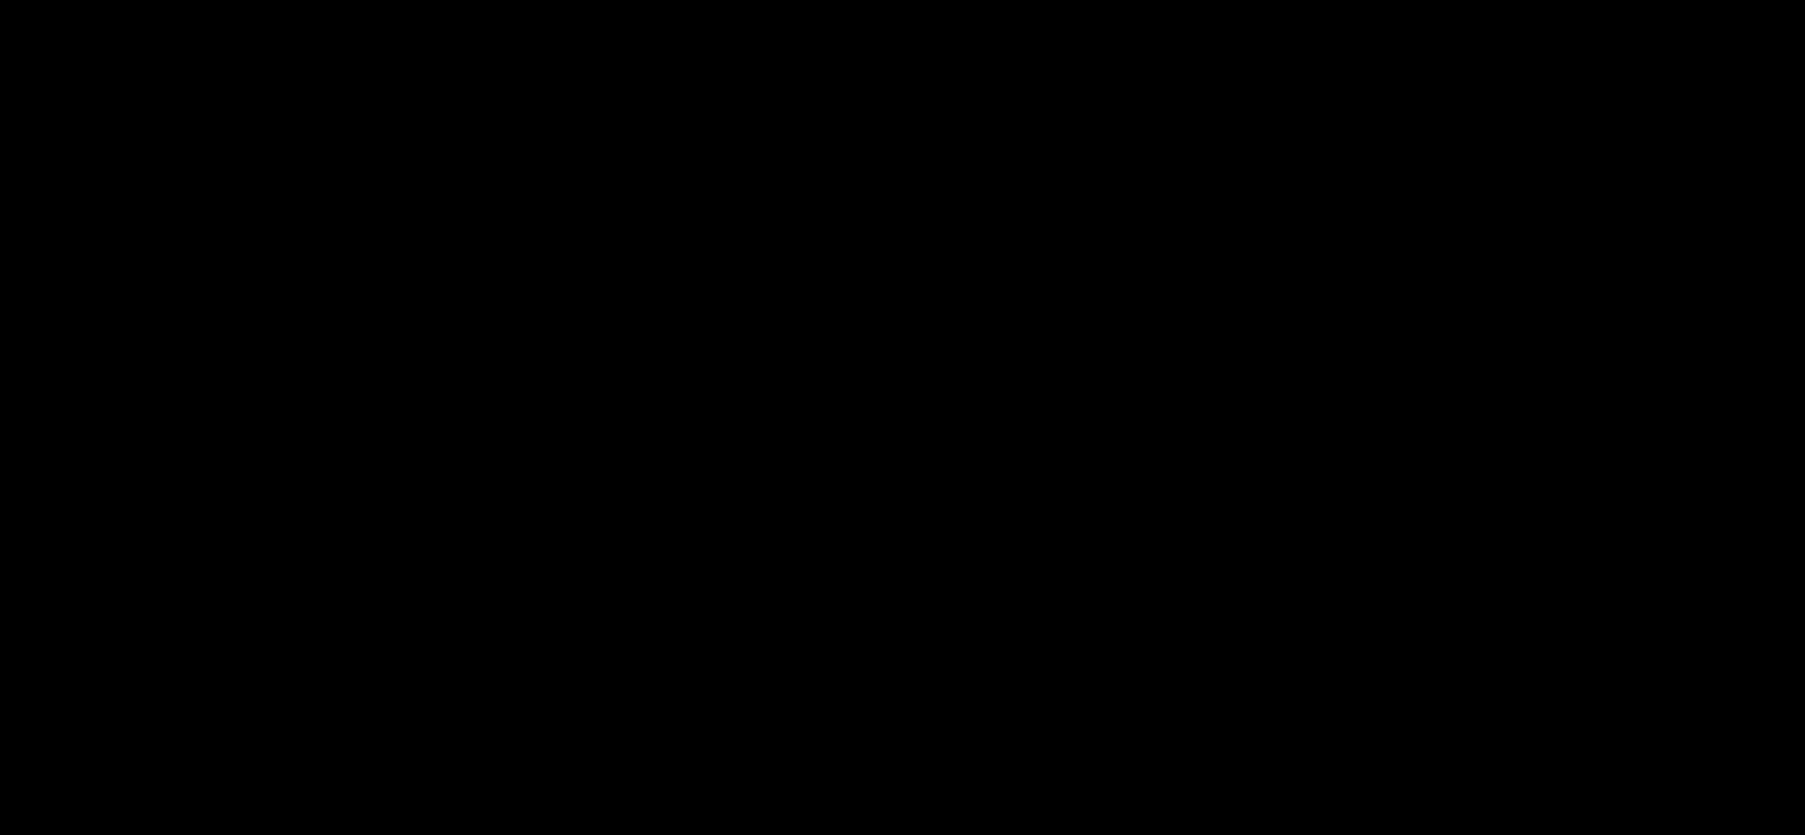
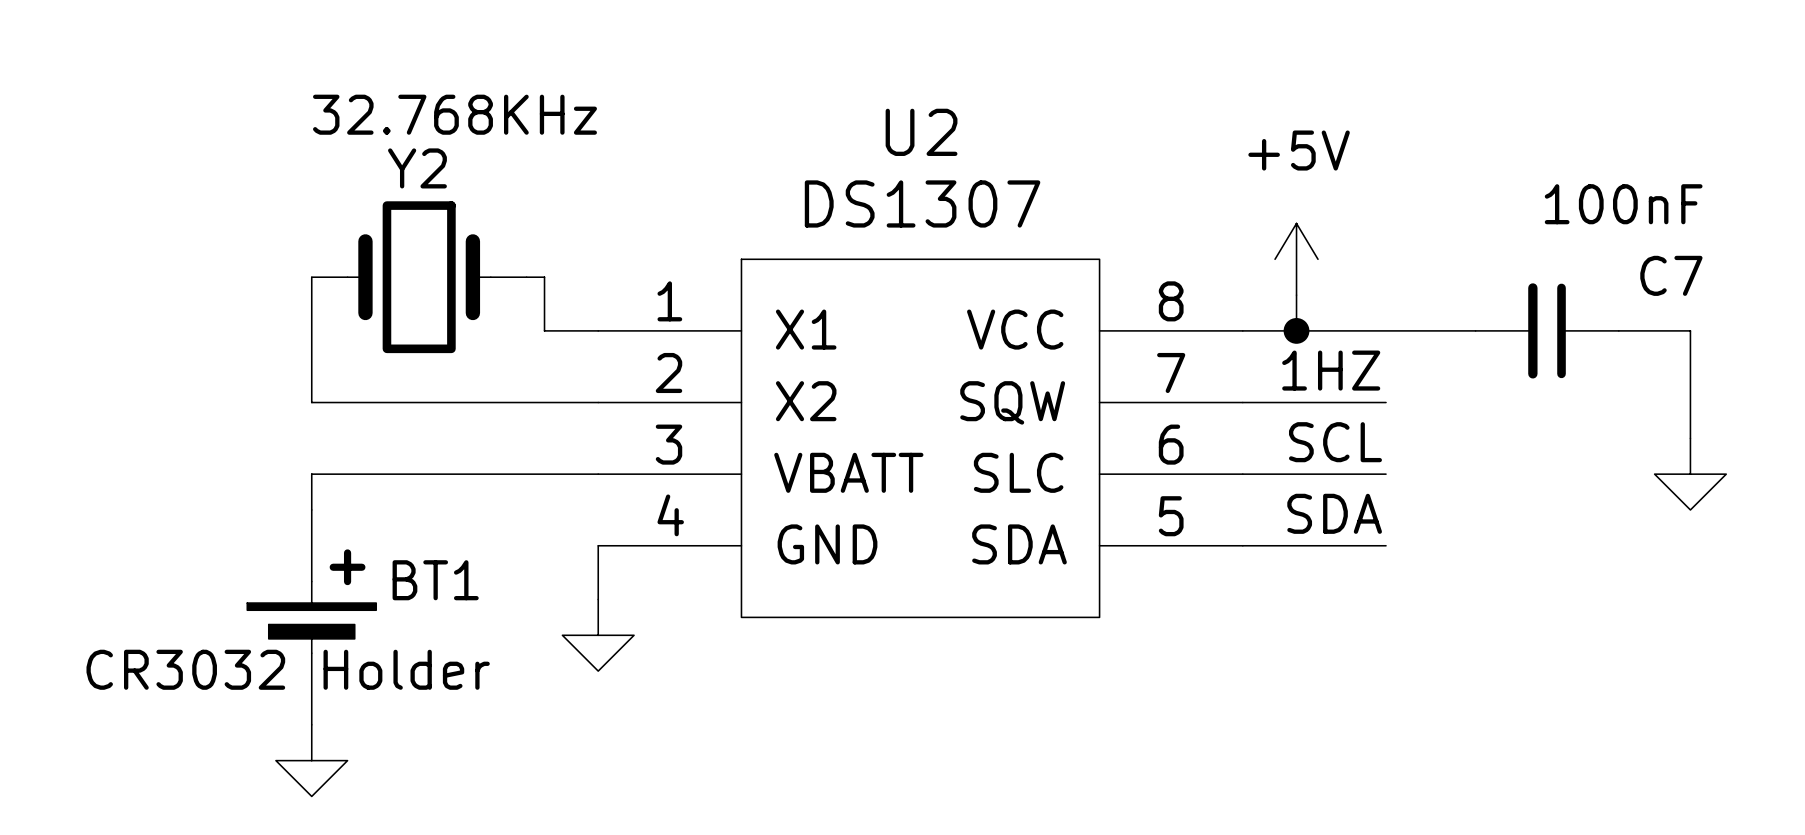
power symbol: none -> +5V (1296, 259)
wire: none -> (311, 277) (311, 402) (598, 402)
Y2: none -> 32.768KHz (419, 277)
wire: none -> (526, 277) (544, 277) (544, 330) (598, 330)
wire: none -> (1296, 295) (1296, 330)
wire: none -> (1242, 330) (1475, 330)
junction: none -> (1296, 330)
C7: none -> 100nF (1547, 330)
wire: none -> (1618, 330) (1690, 330) (1690, 438)
label: none -> 1HZ (1331, 370)
wire: none -> (1242, 402) (1386, 402)
U2: none -> DS1307 (920, 438)
label: none -> SCL (1335, 442)
wire: none -> (598, 474) (311, 474) (311, 509)
wire: none -> (1242, 474) (1386, 474)
power symbol: none -> (1690, 474)
label: none -> SDA (1334, 513)
wire: none -> (598, 545) (598, 599)
wire: none -> (1242, 545) (1386, 545)
BT1: none -> CR3032 Holder (311, 617)
power symbol: none -> (598, 635)
power symbol: none -> (311, 760)

